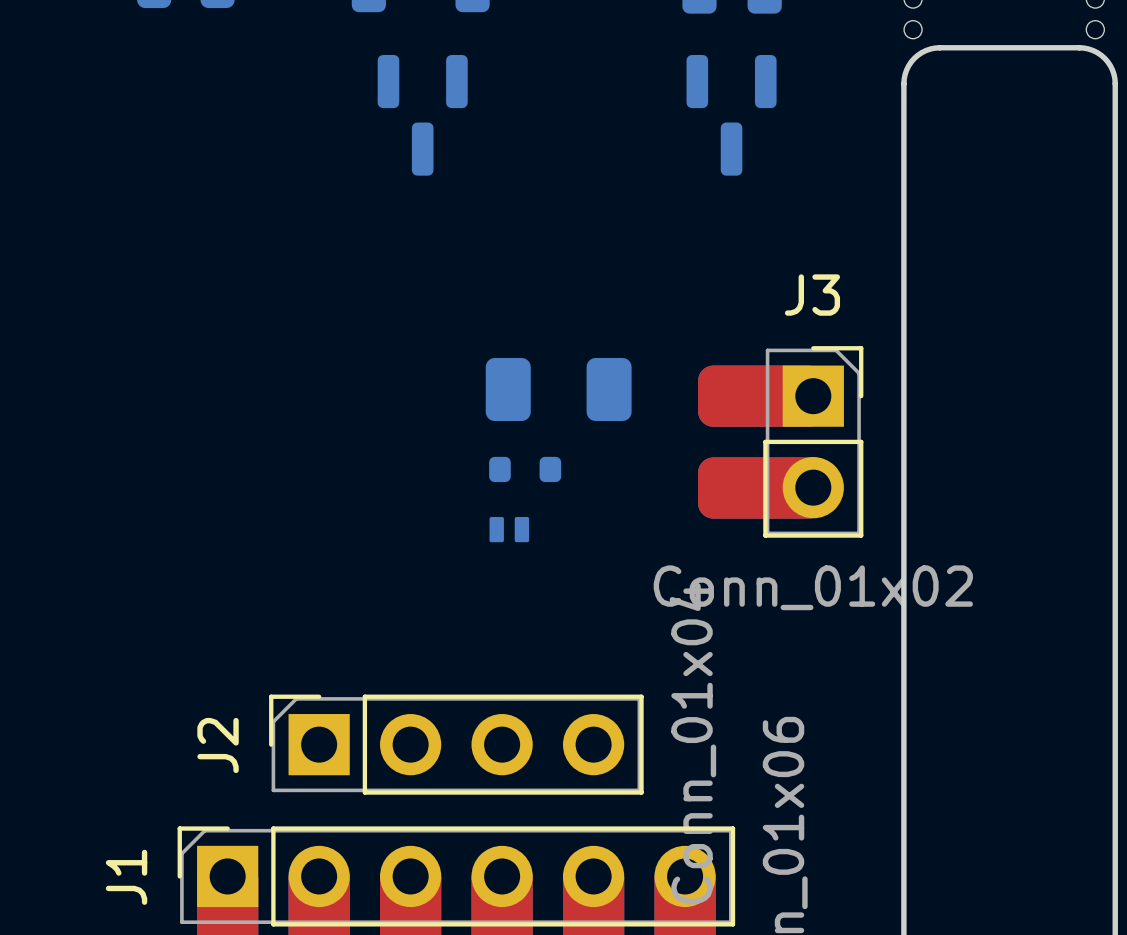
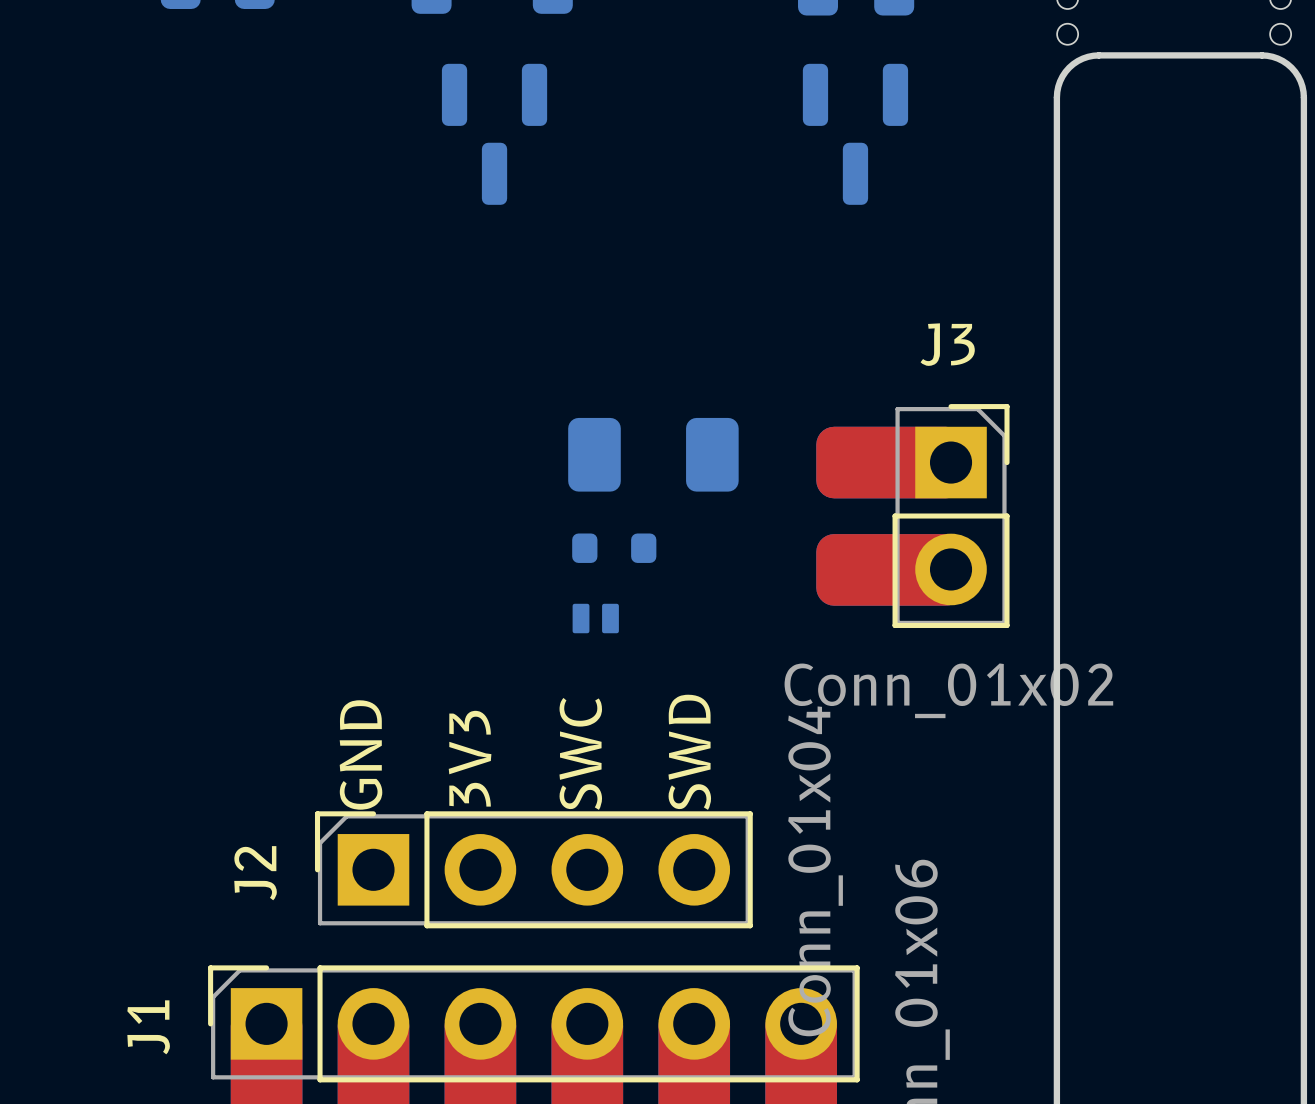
text: none -> SWC (580, 753)
text: none -> SWD (689, 752)
text: none -> GND (361, 754)
text: none -> 3V3 (470, 758)

